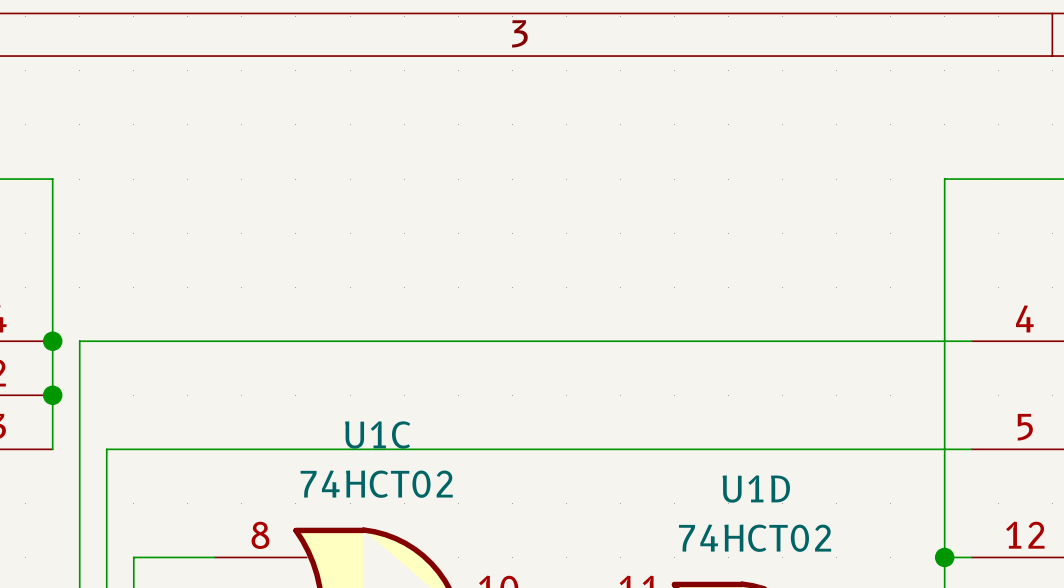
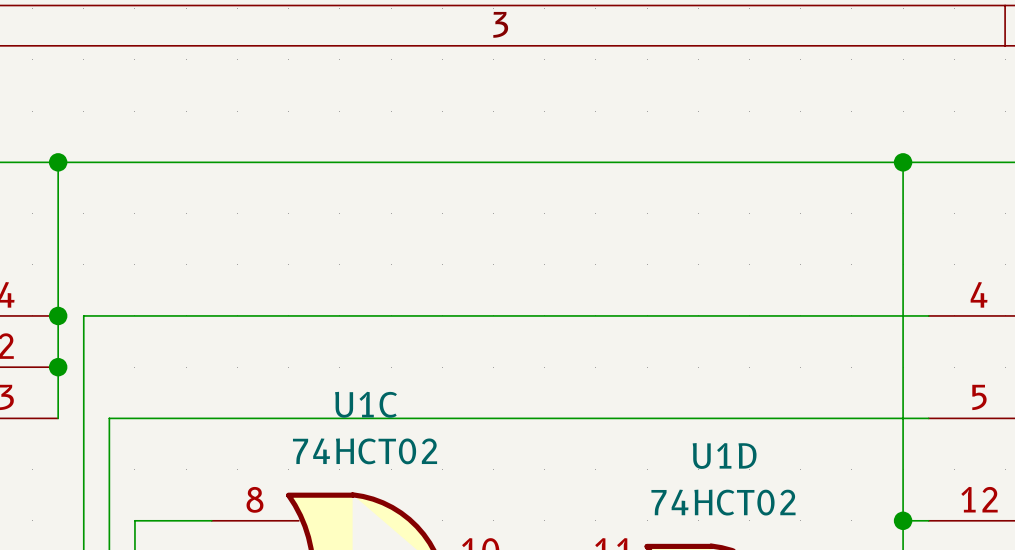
wire: none -> (58, 162) (903, 162)
junction: none -> (58, 162)
junction: none -> (903, 162)

